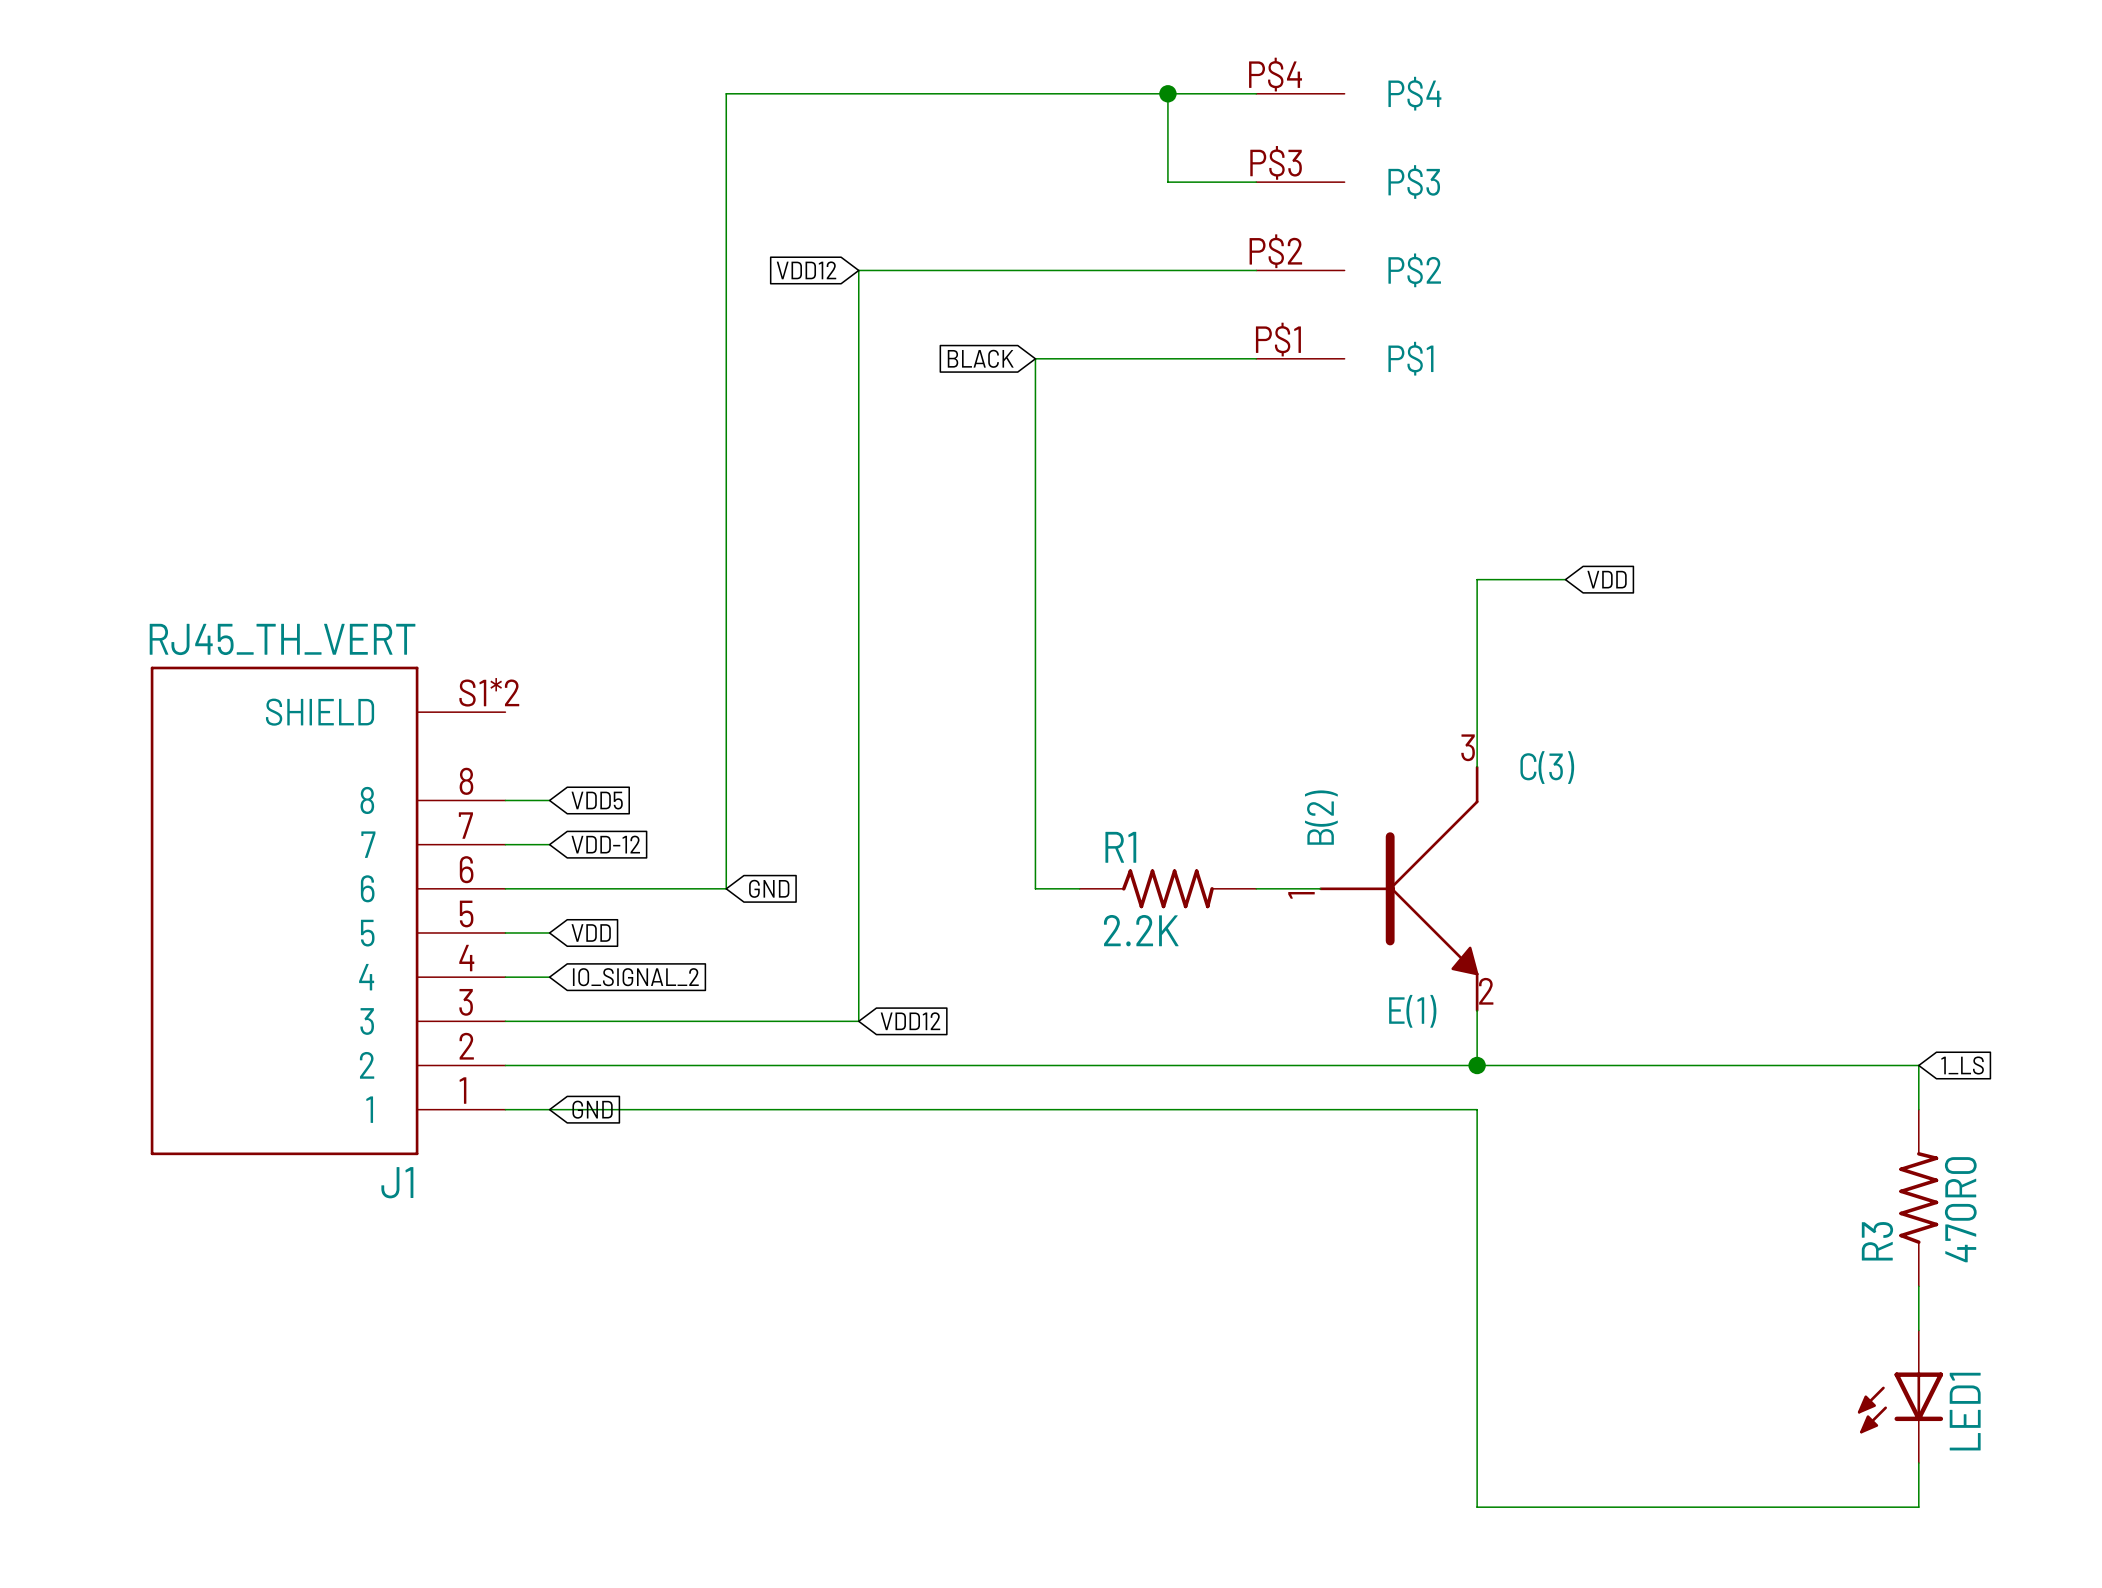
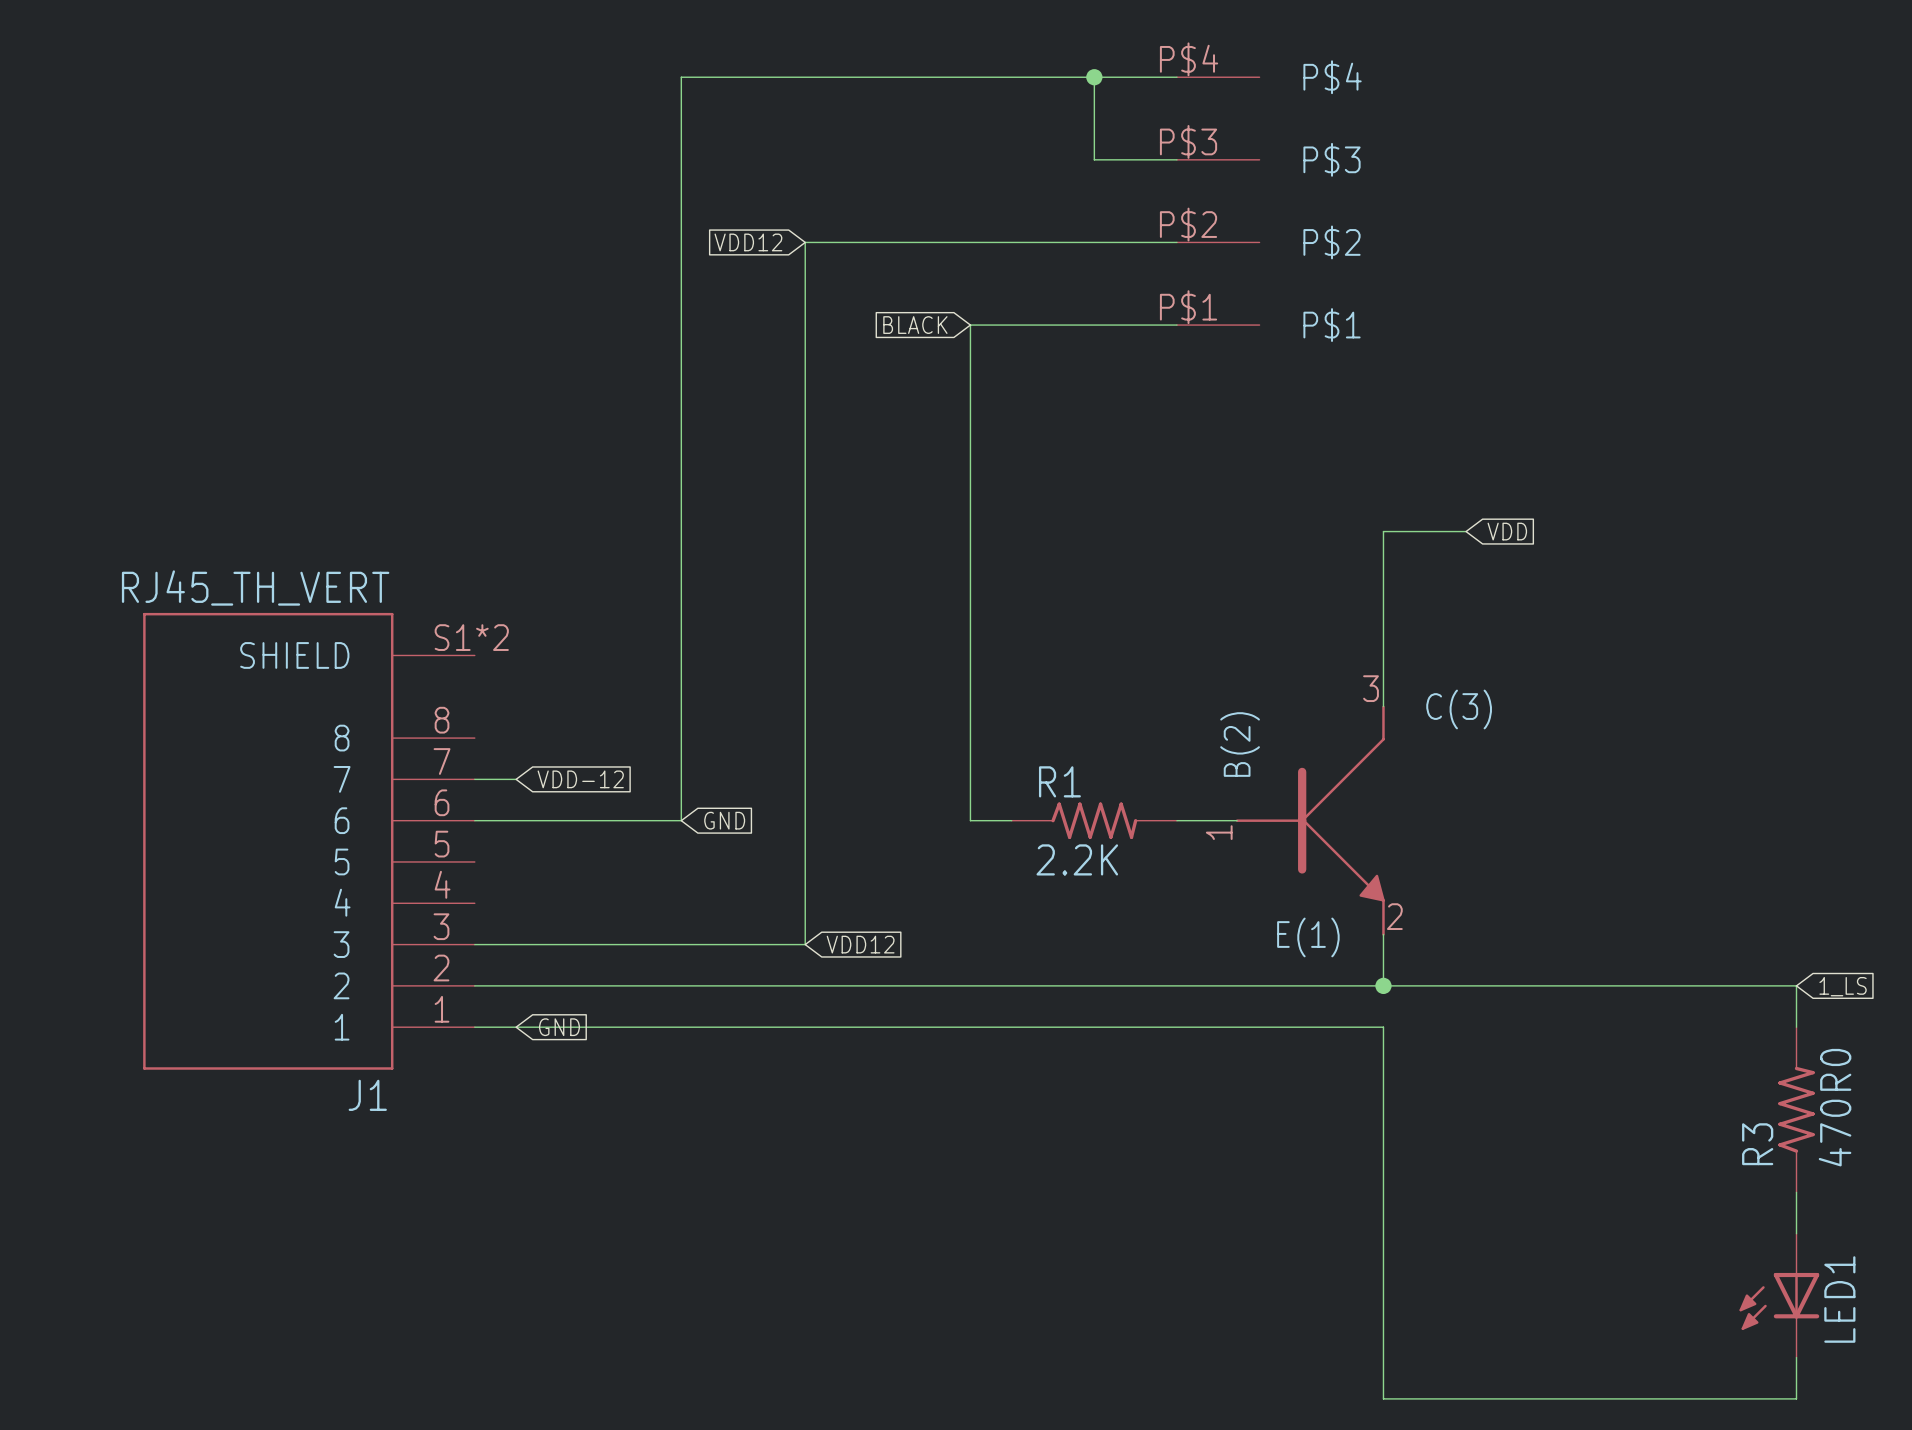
wire: (505, 800) (549, 800) -> none
global label: VDD5 (597, 800) -> none
wire: (505, 932) (549, 932) -> none
global label: VDD (591, 932) -> none
wire: (505, 977) (549, 977) -> none
global label: IO_SIGNAL_2 (635, 977) -> none

